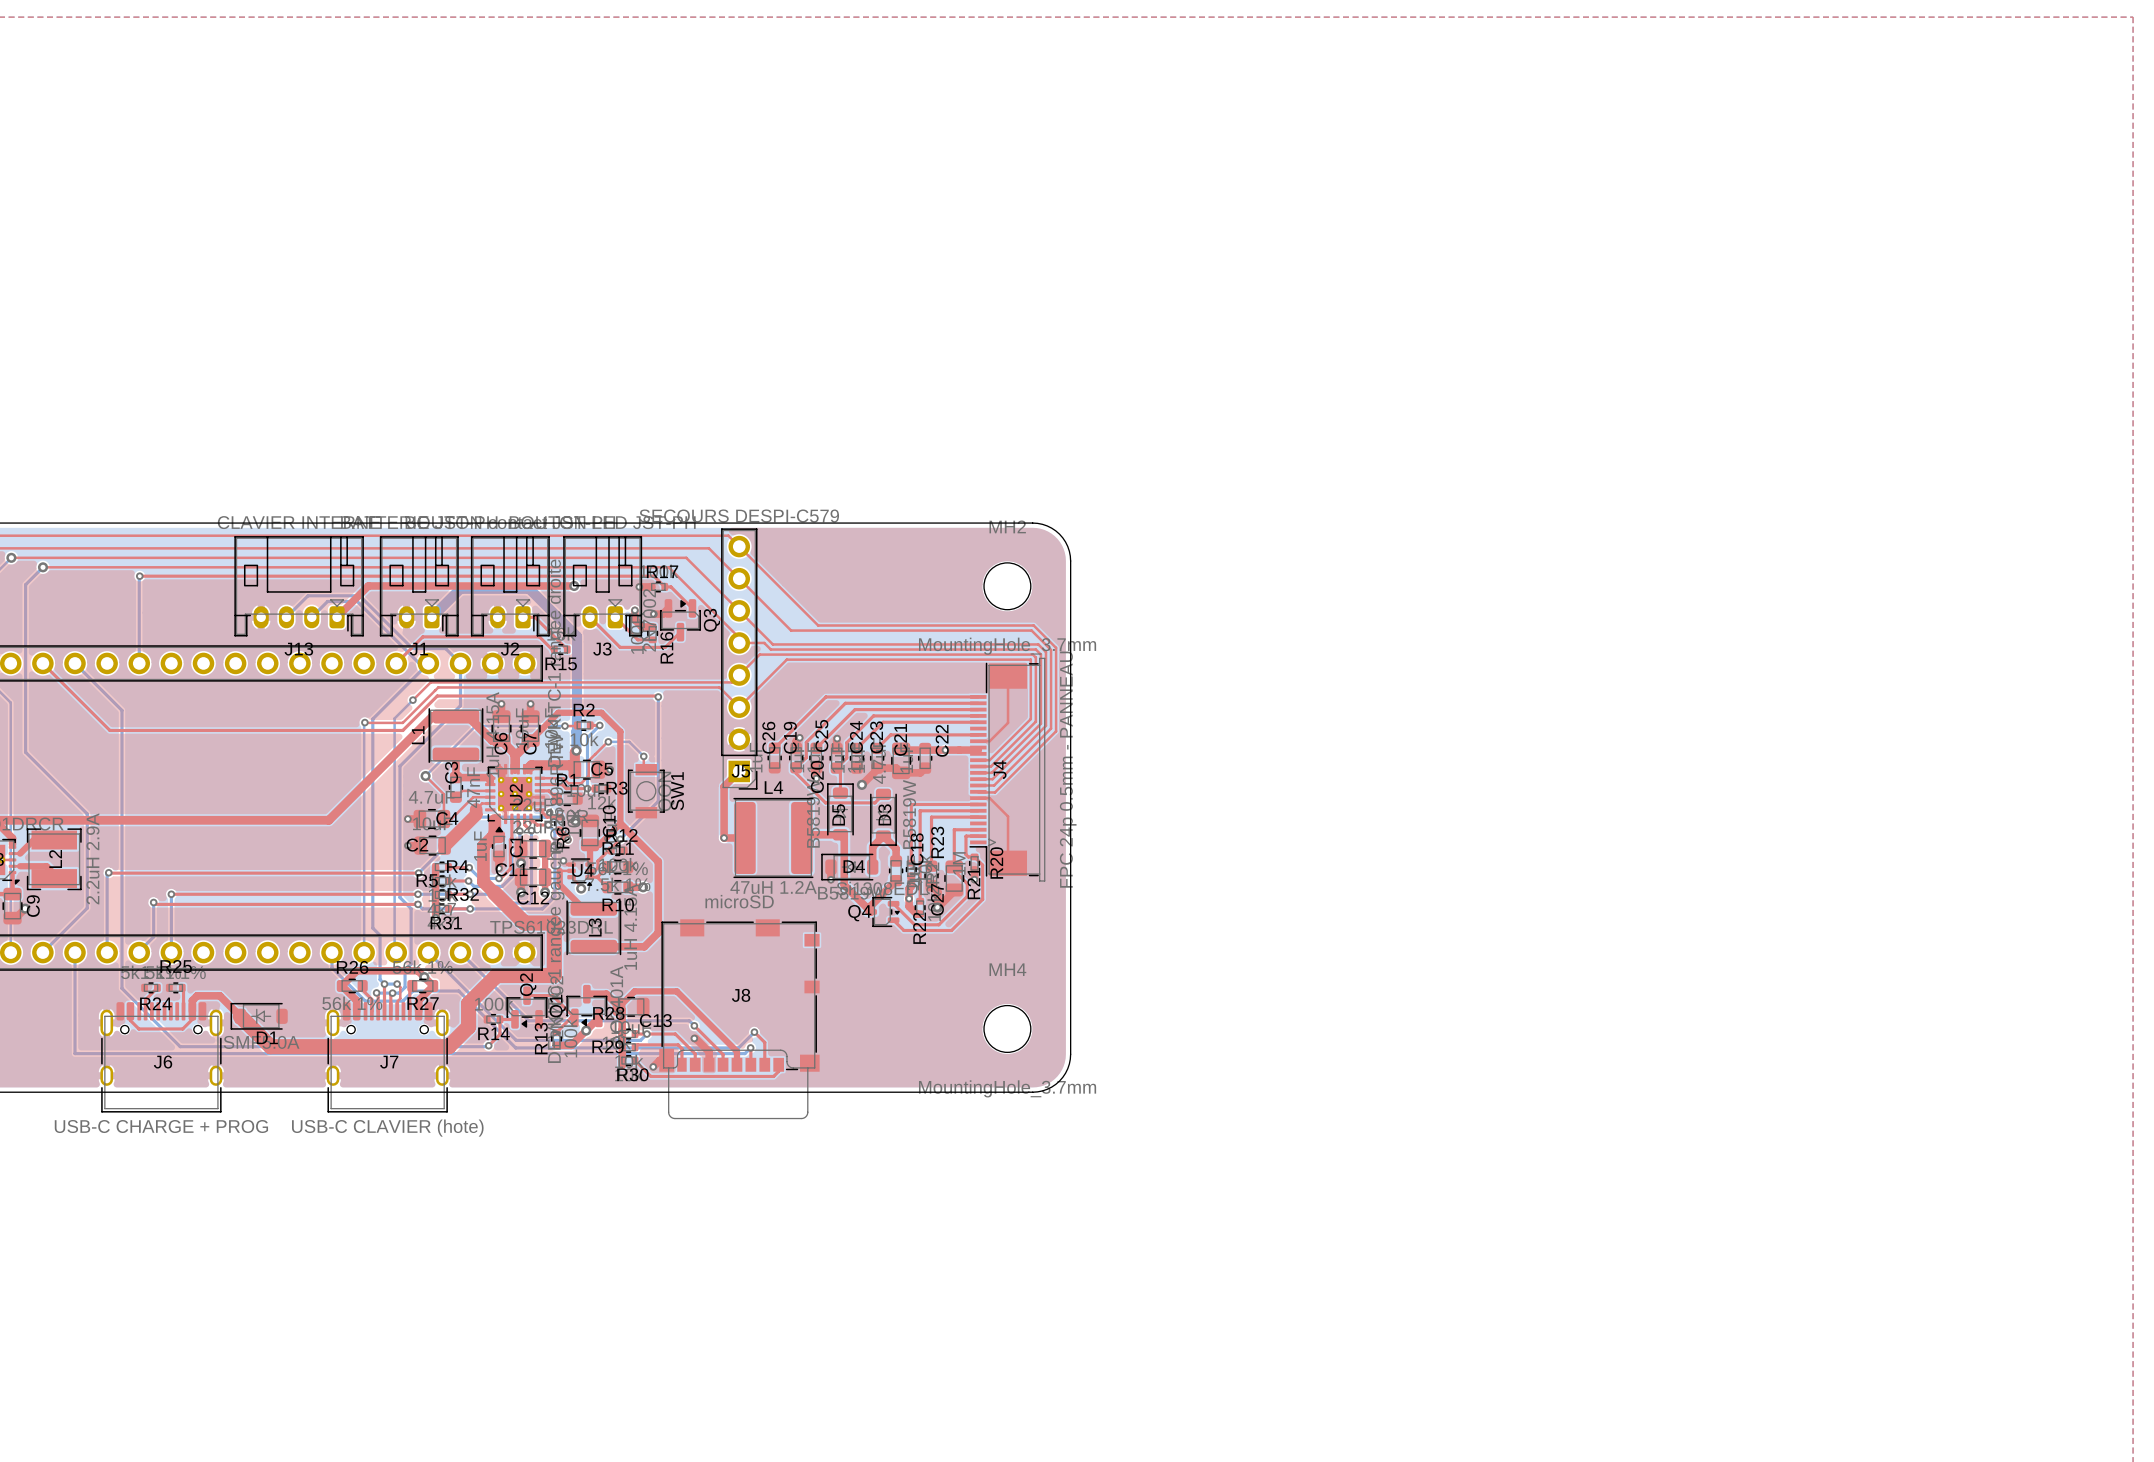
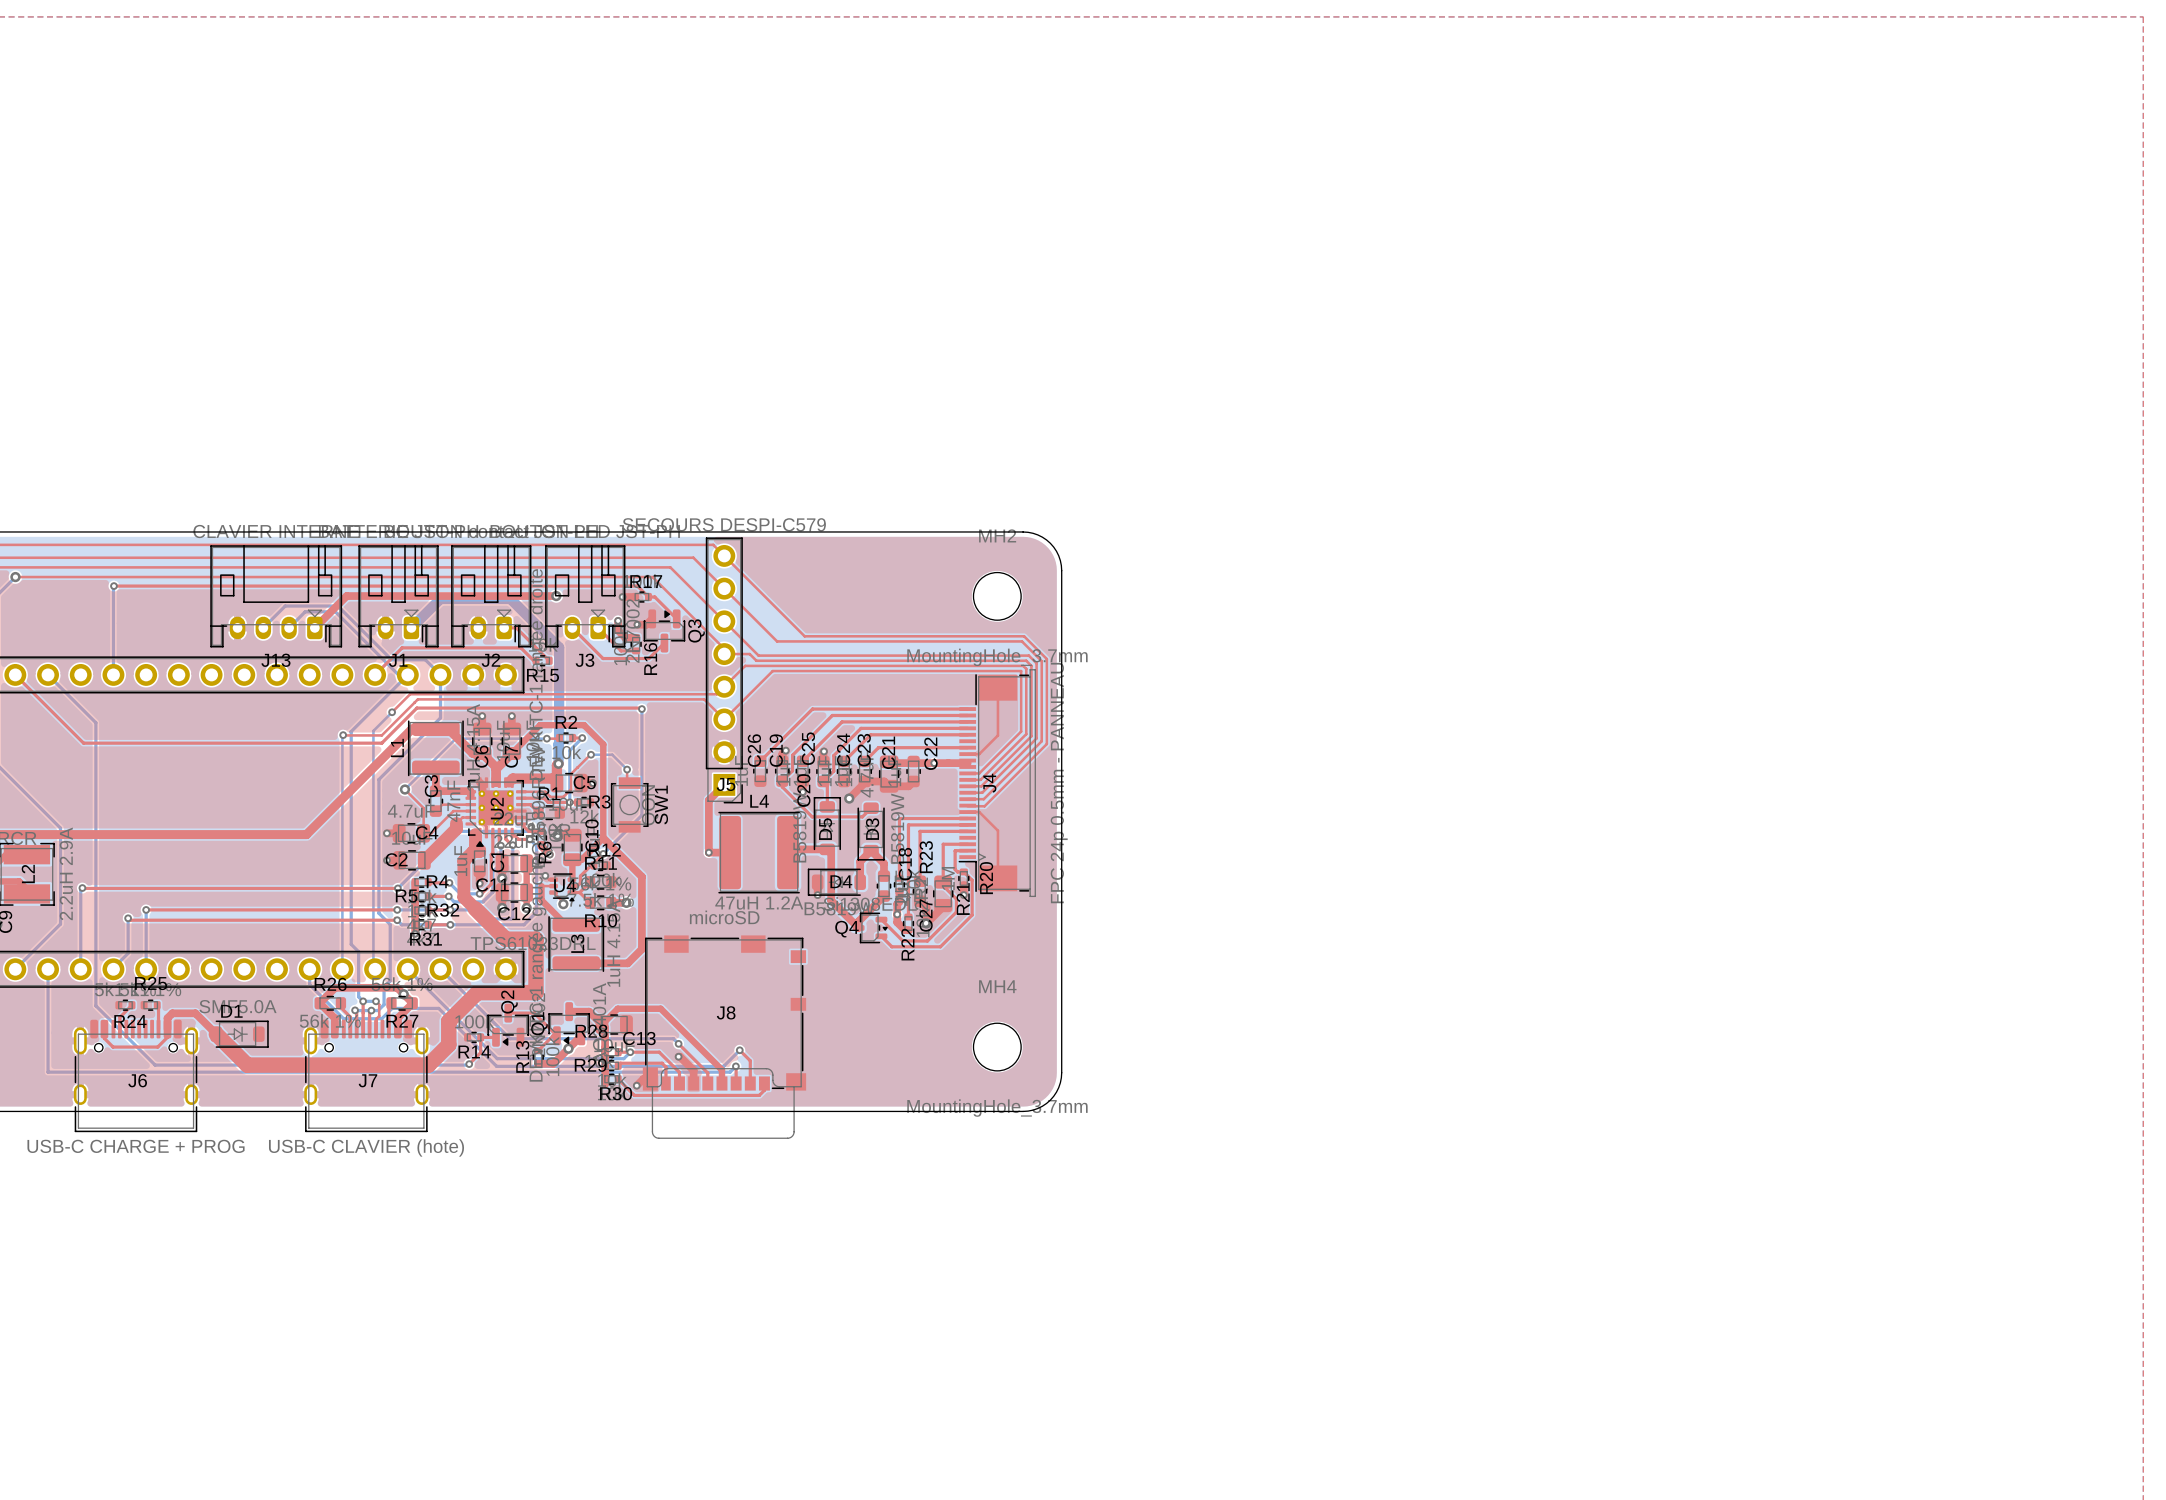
D1 rotation: 0° (259, 1016) -> 180° (239, 1034)

